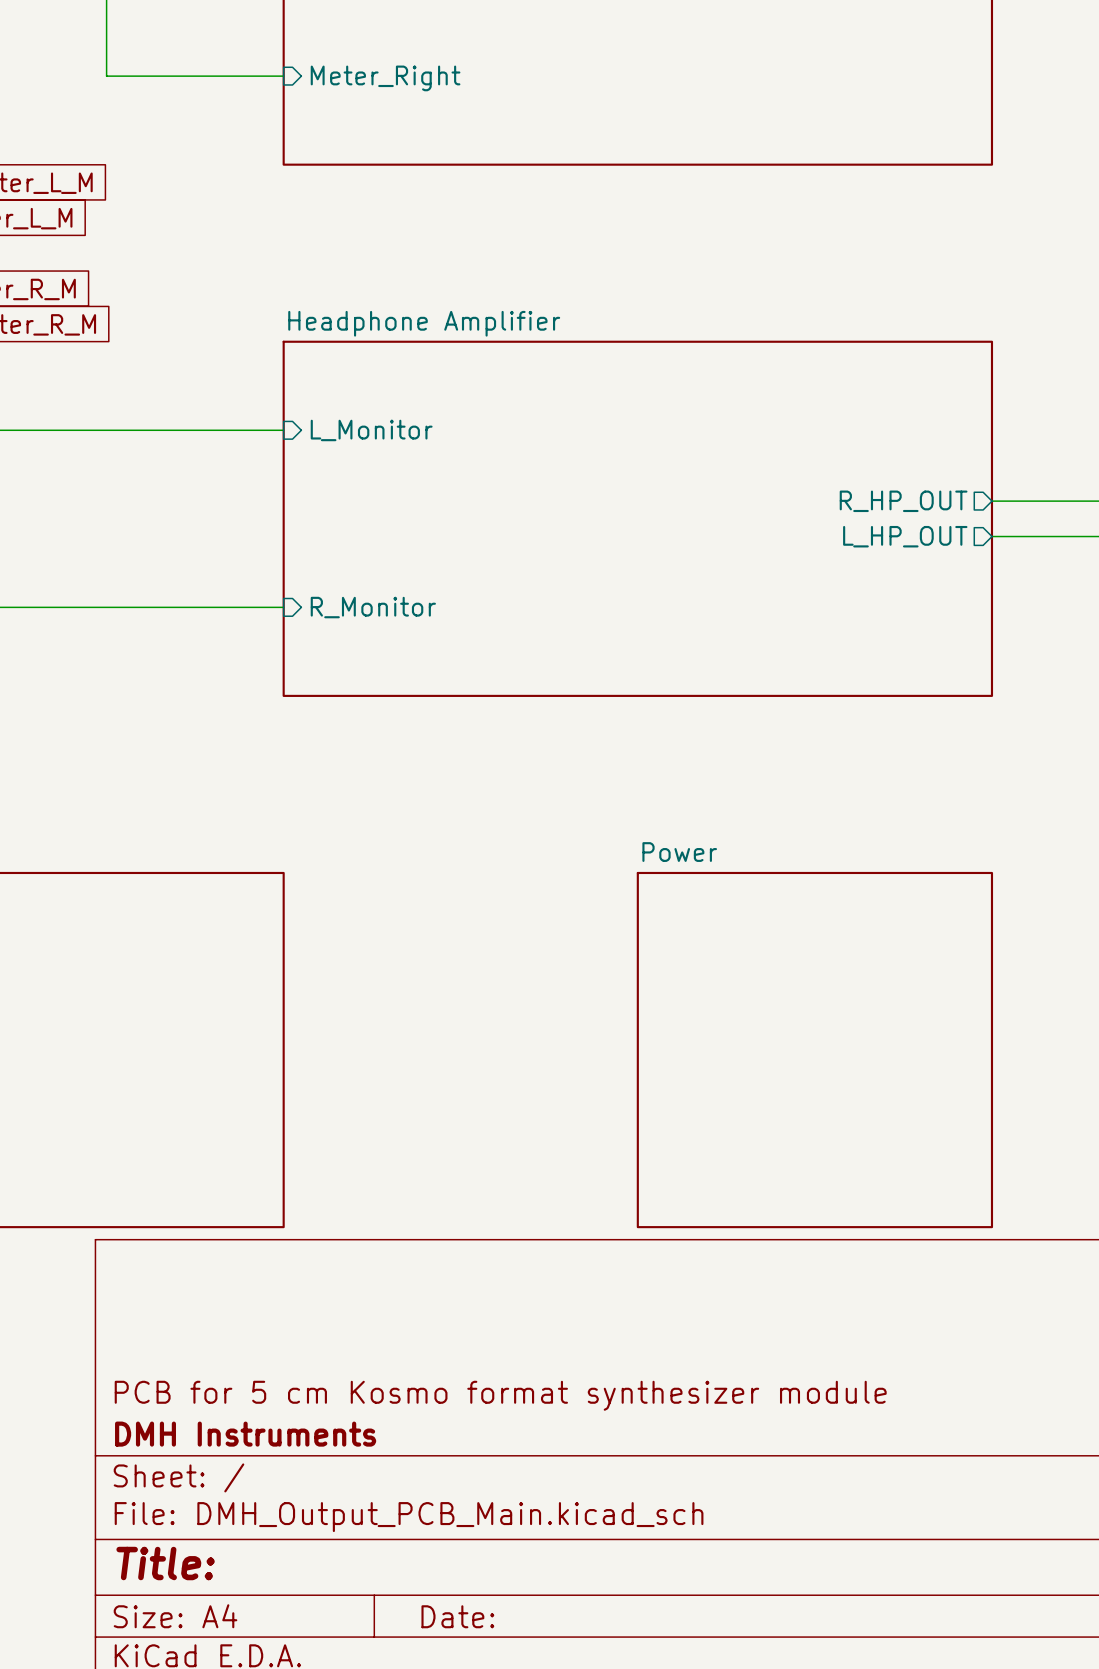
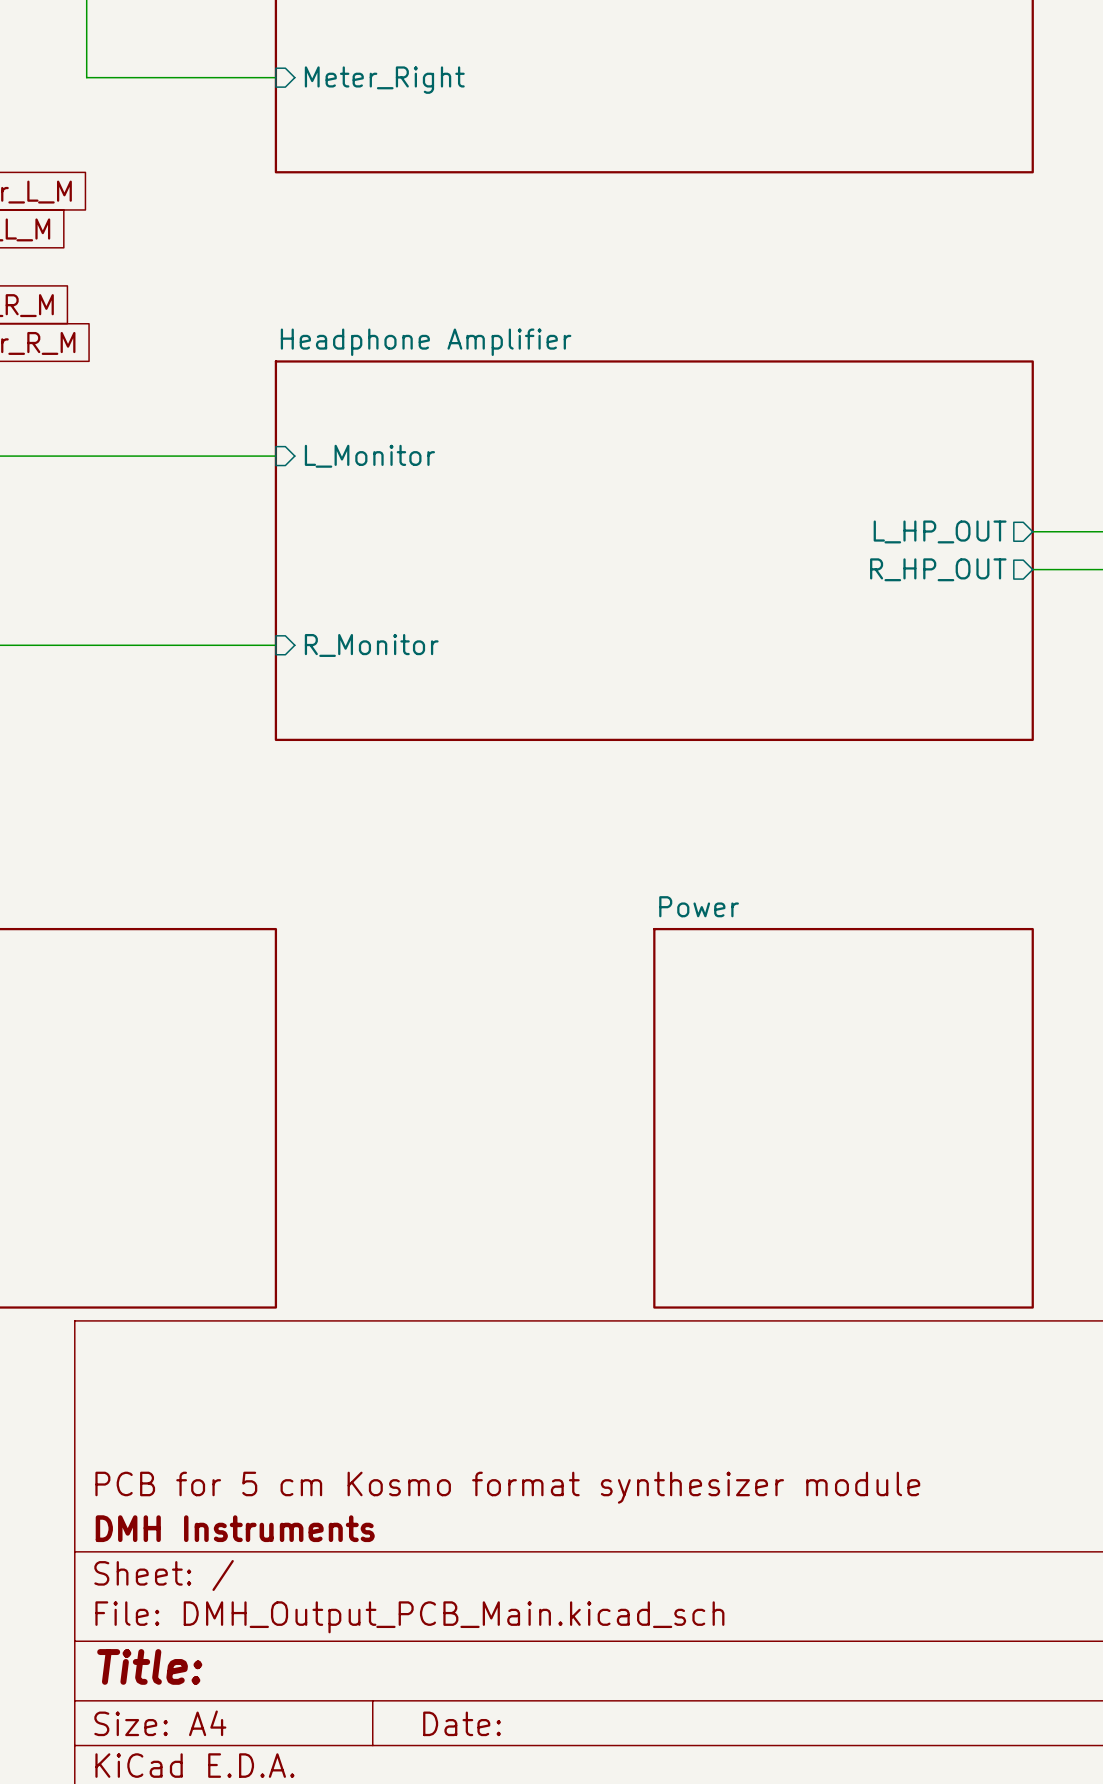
sheet pin: R_HP_OUT (903, 501) -> L_HP_OUT (940, 531)
sheet pin: L_HP_OUT (905, 536) -> R_HP_OUT (938, 569)

